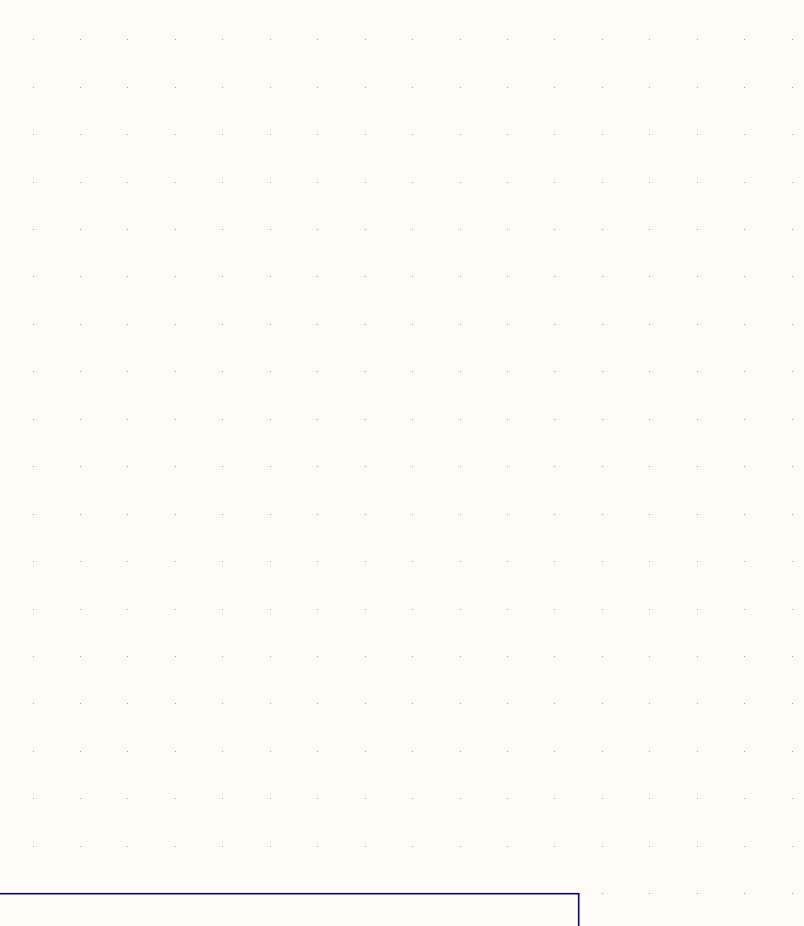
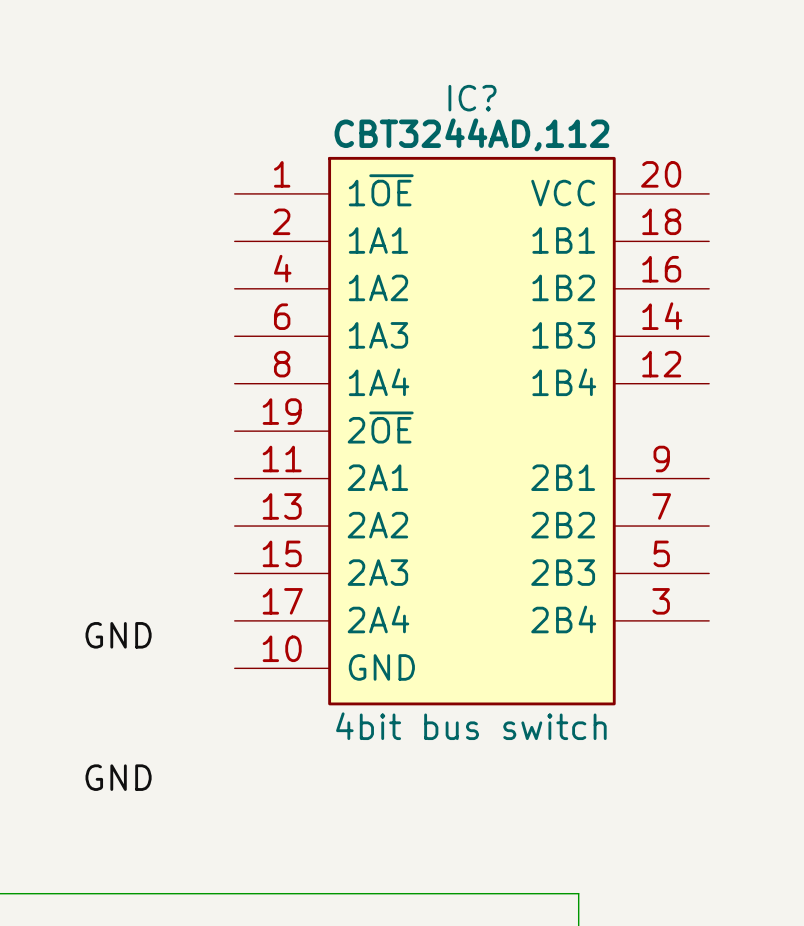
IC?: none -> CBT3244AD,112 (471, 431)
label: none -> GND (118, 635)
label: none -> GND (118, 777)

